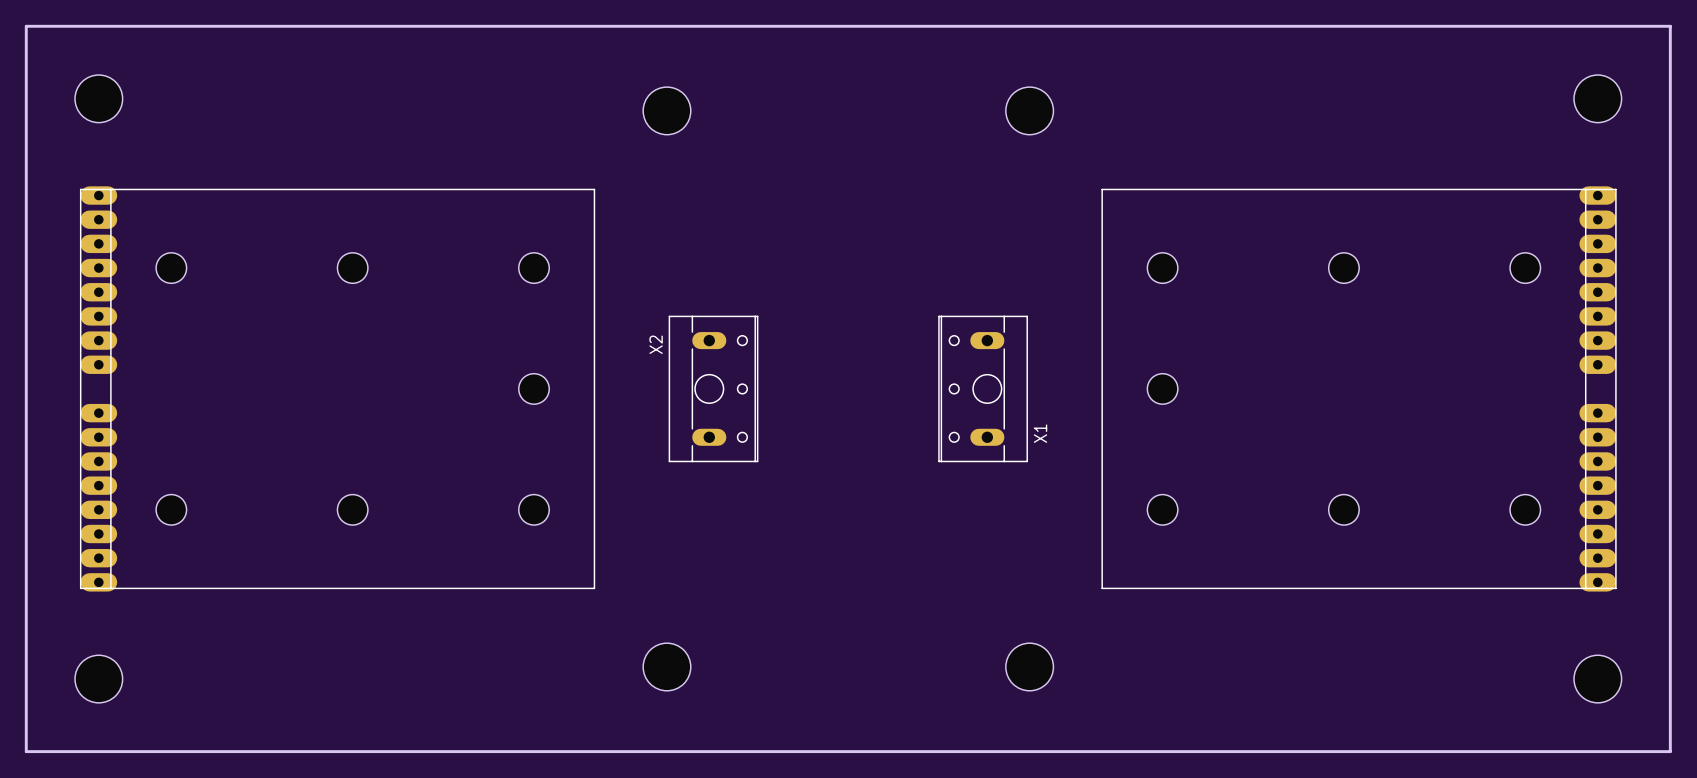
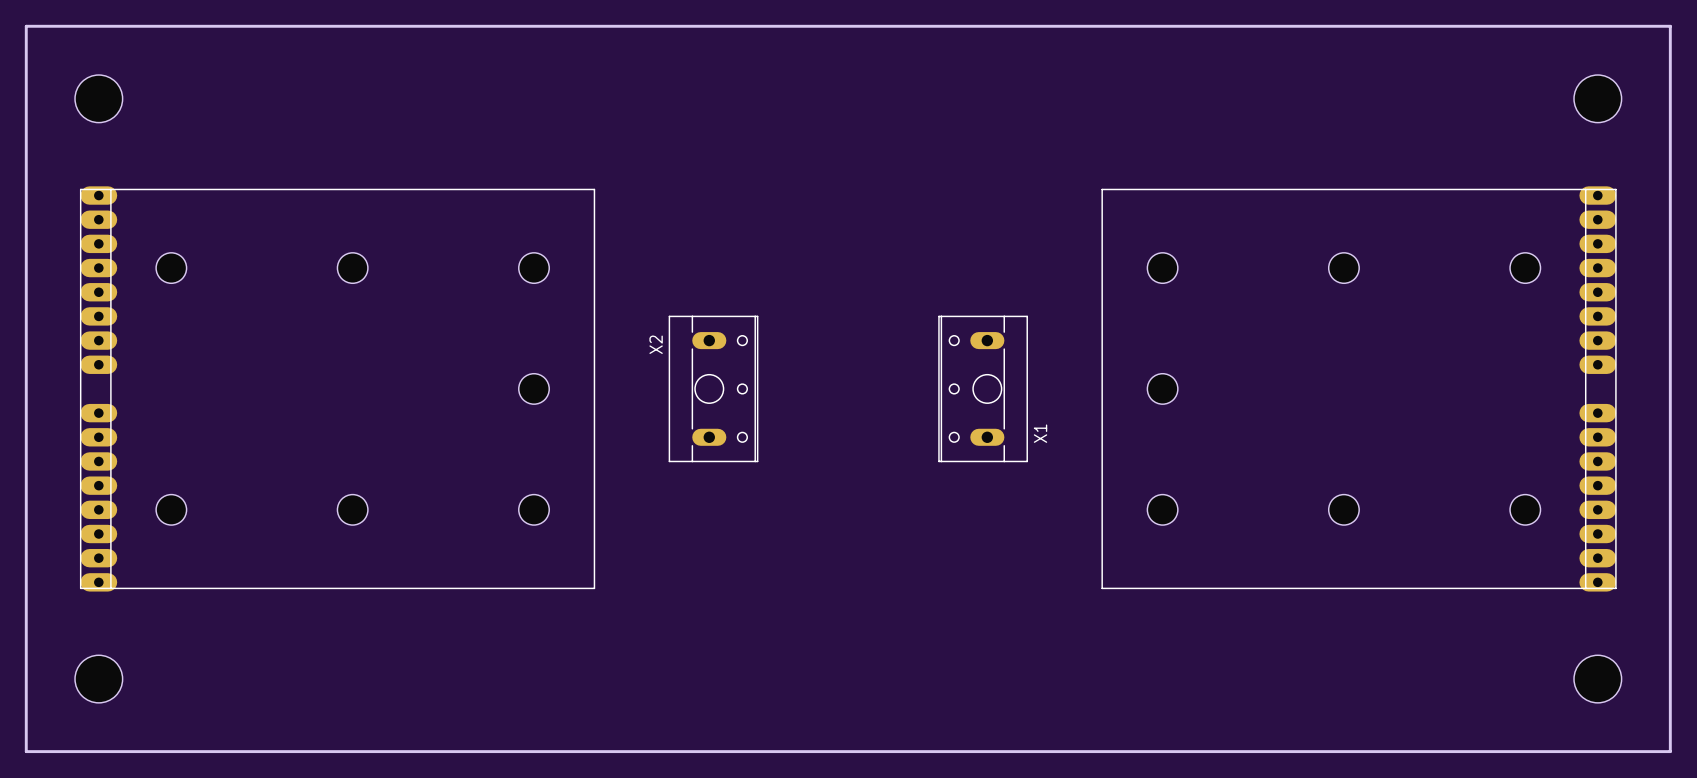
hole: (666, 110) -> none
hole: (1029, 110) -> none
hole: (666, 666) -> none
hole: (1029, 666) -> none

